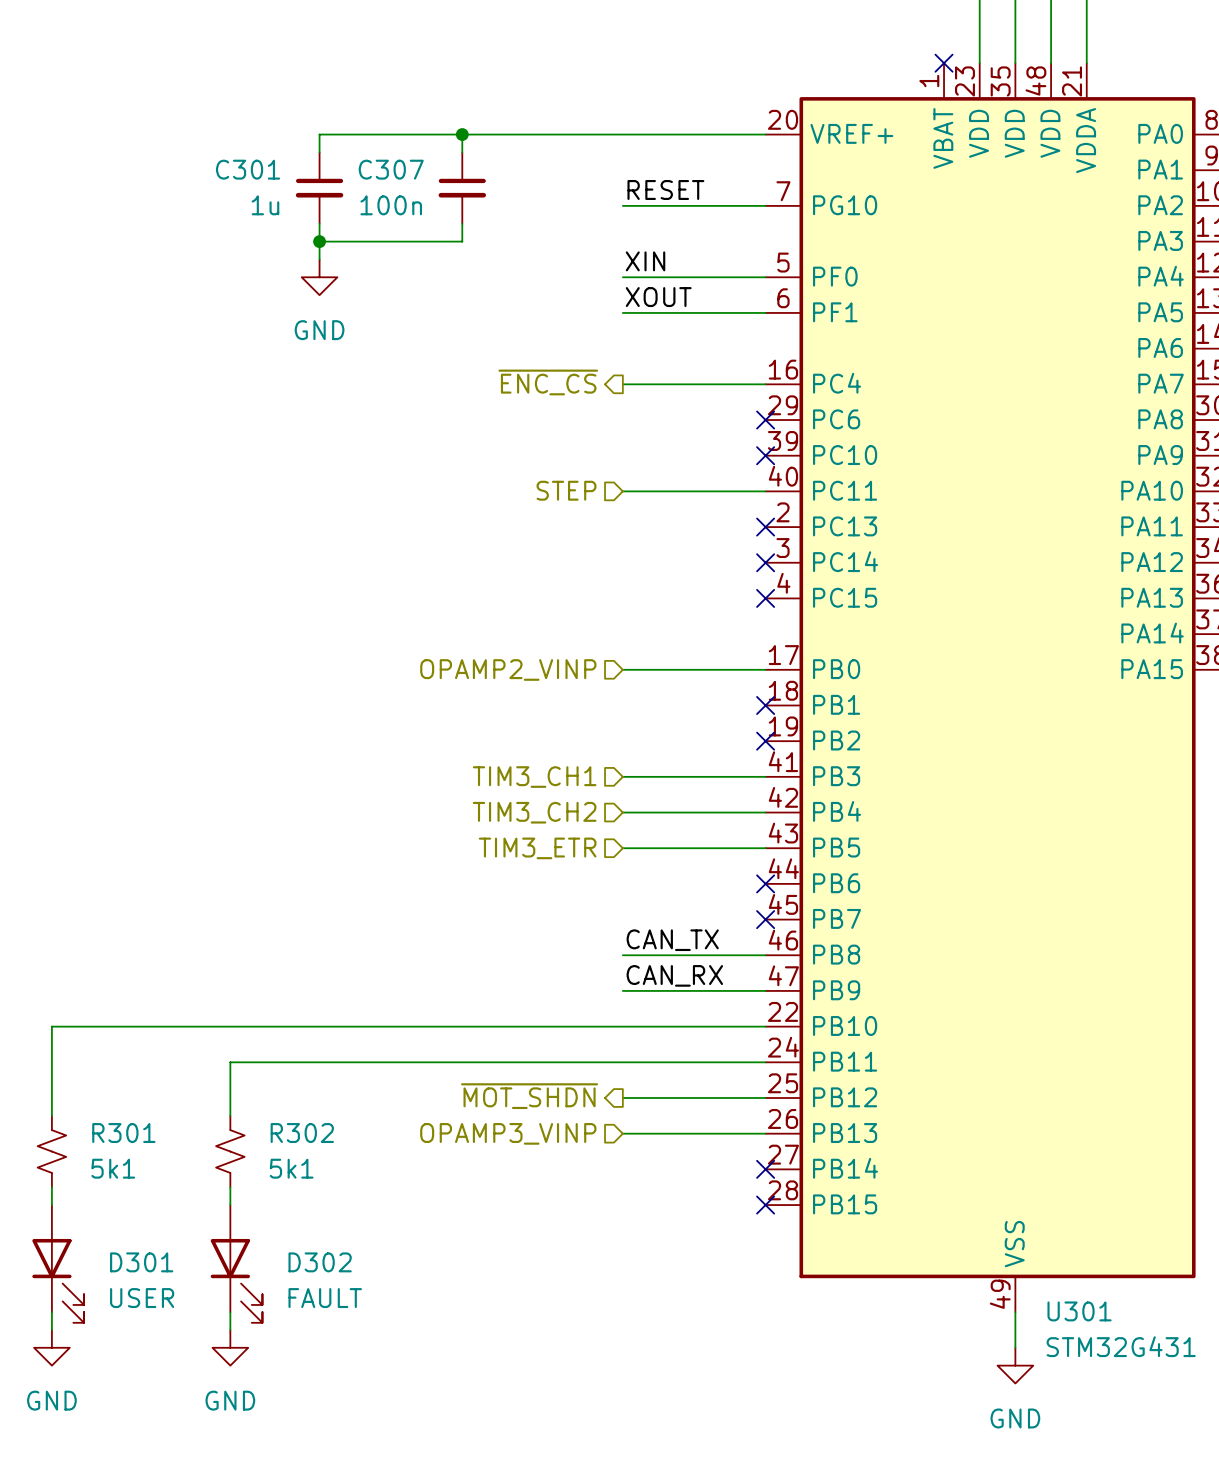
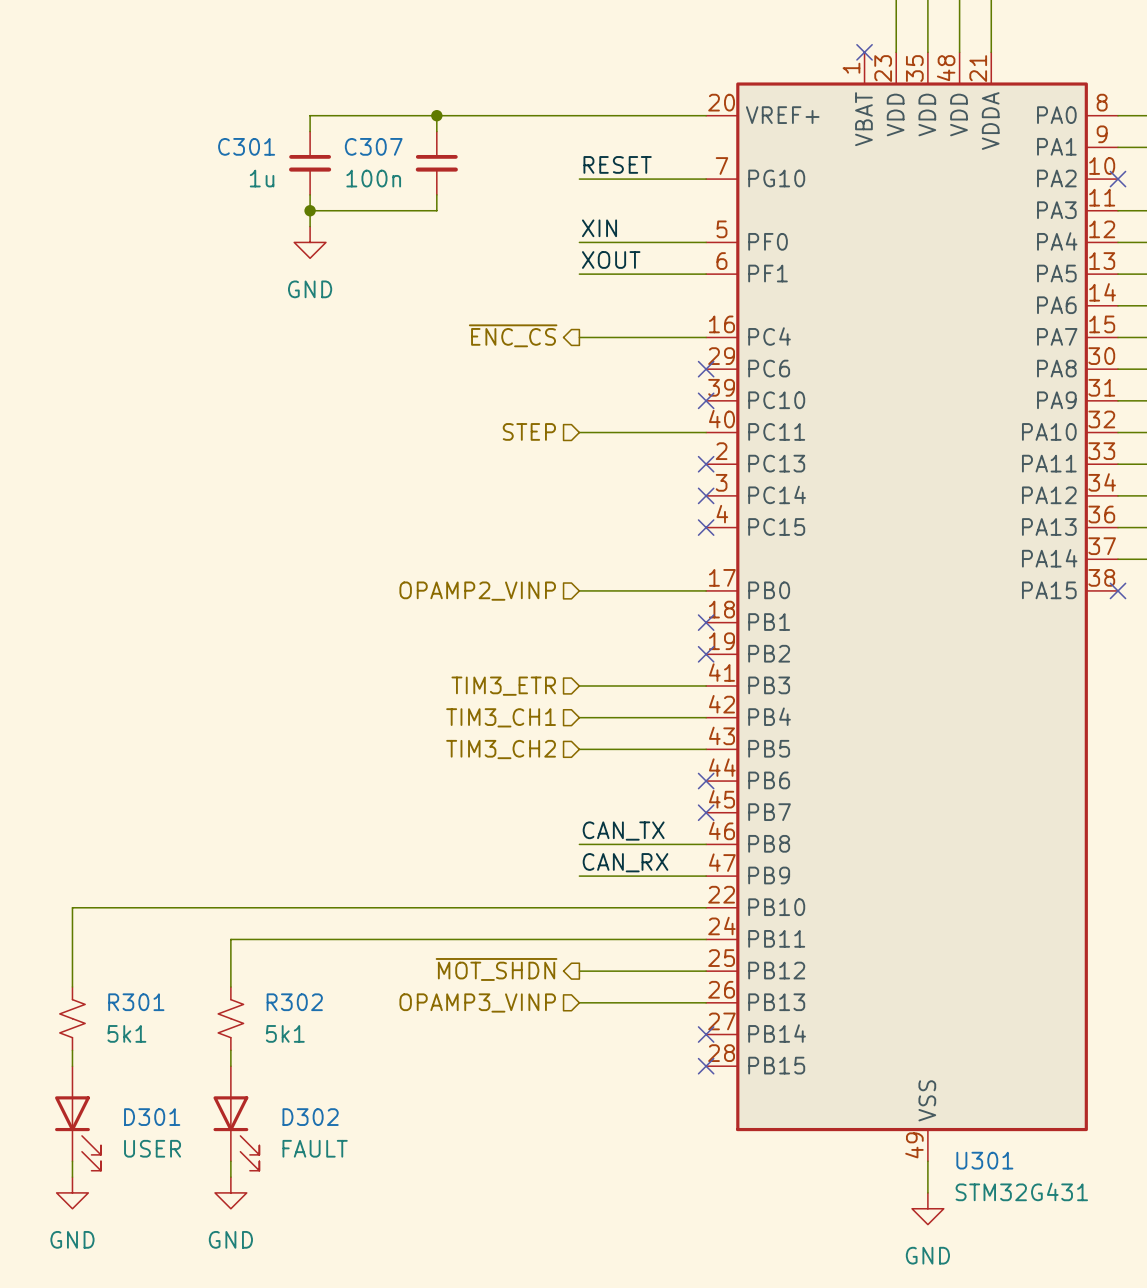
hierarchical label: TIM3_CH1 (534, 777) -> TIM3_ETR (503, 686)
hierarchical label: TIM3_CH2 (534, 812) -> TIM3_CH1 (501, 717)
hierarchical label: TIM3_ETR (537, 848) -> TIM3_CH2 (501, 749)

